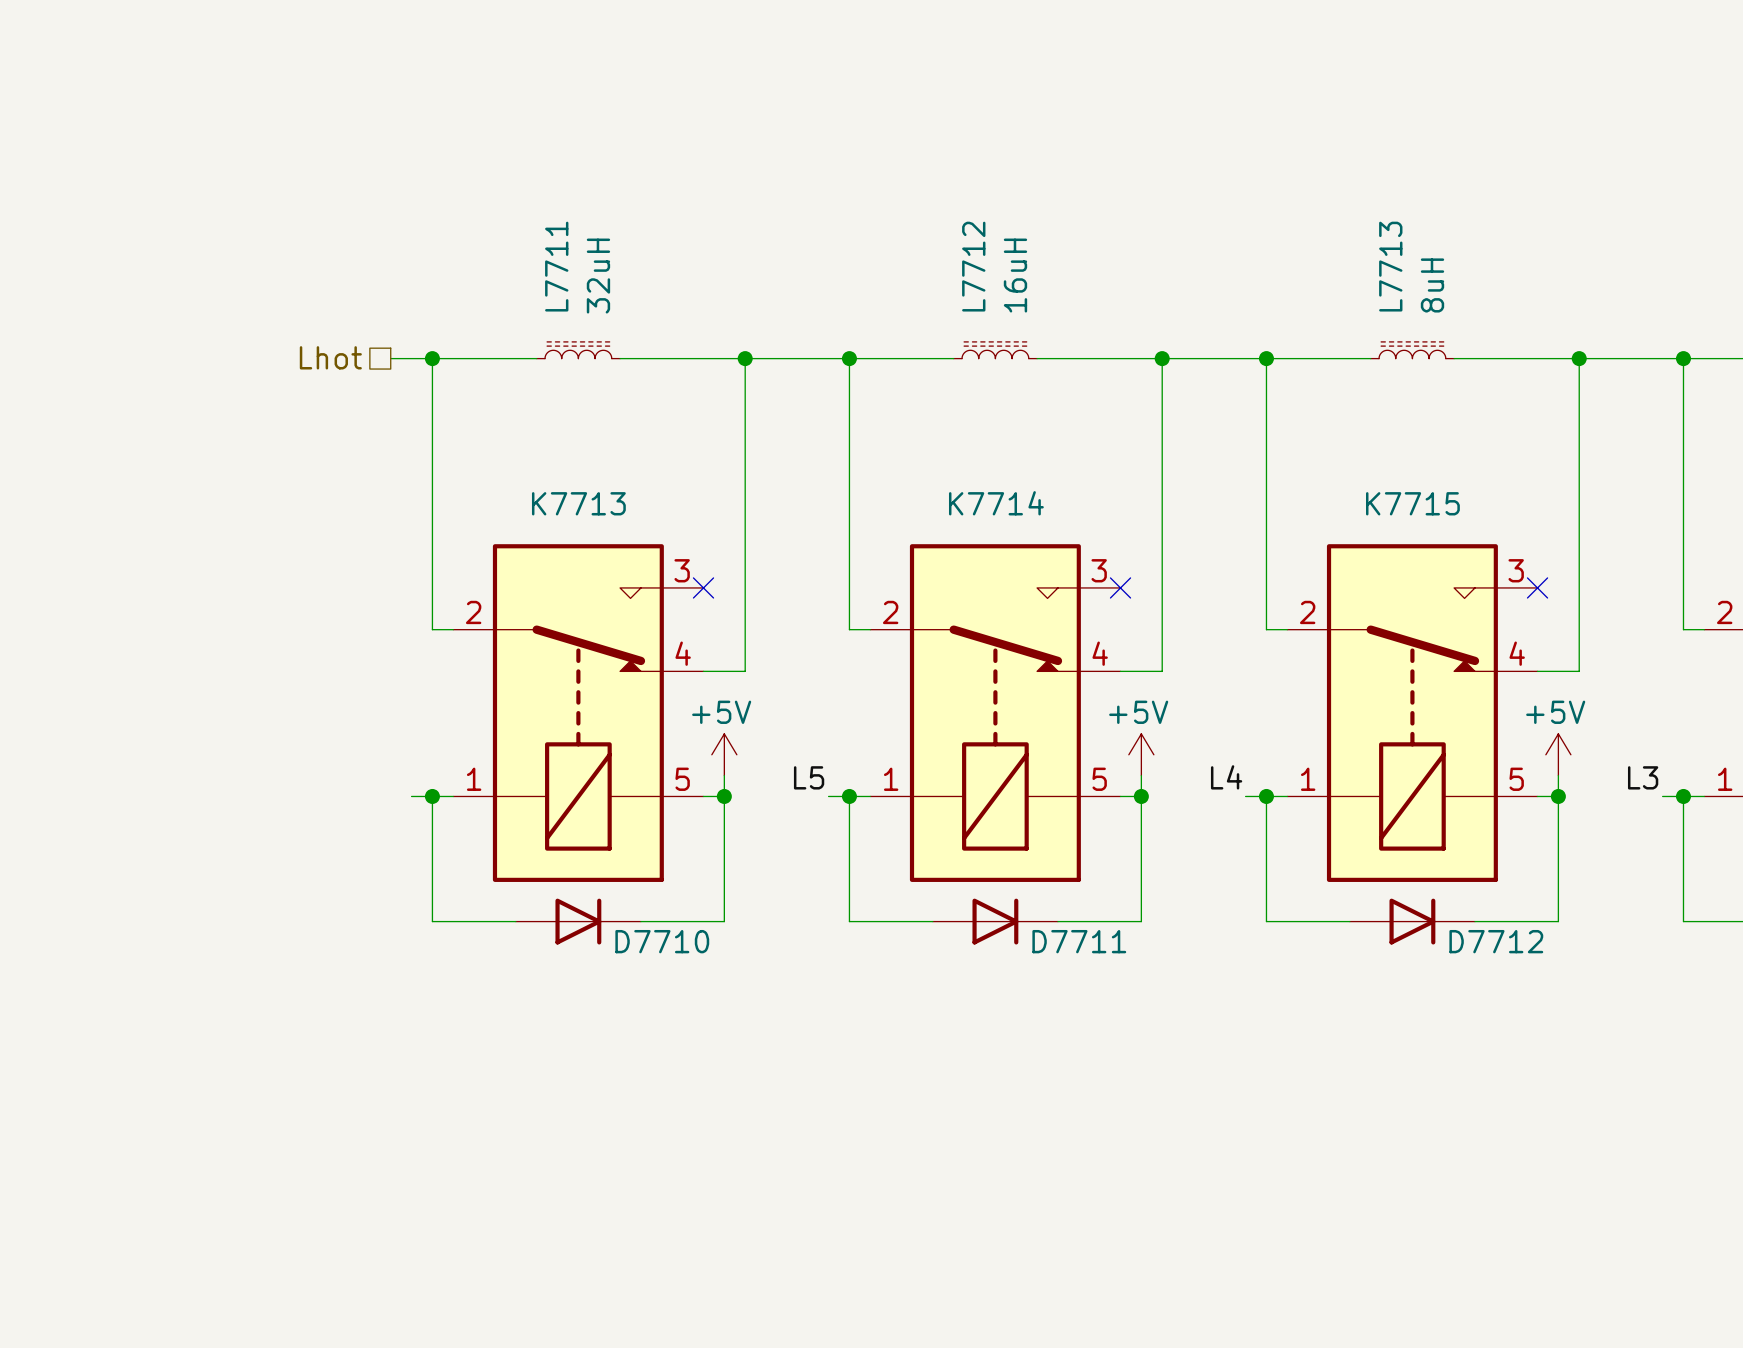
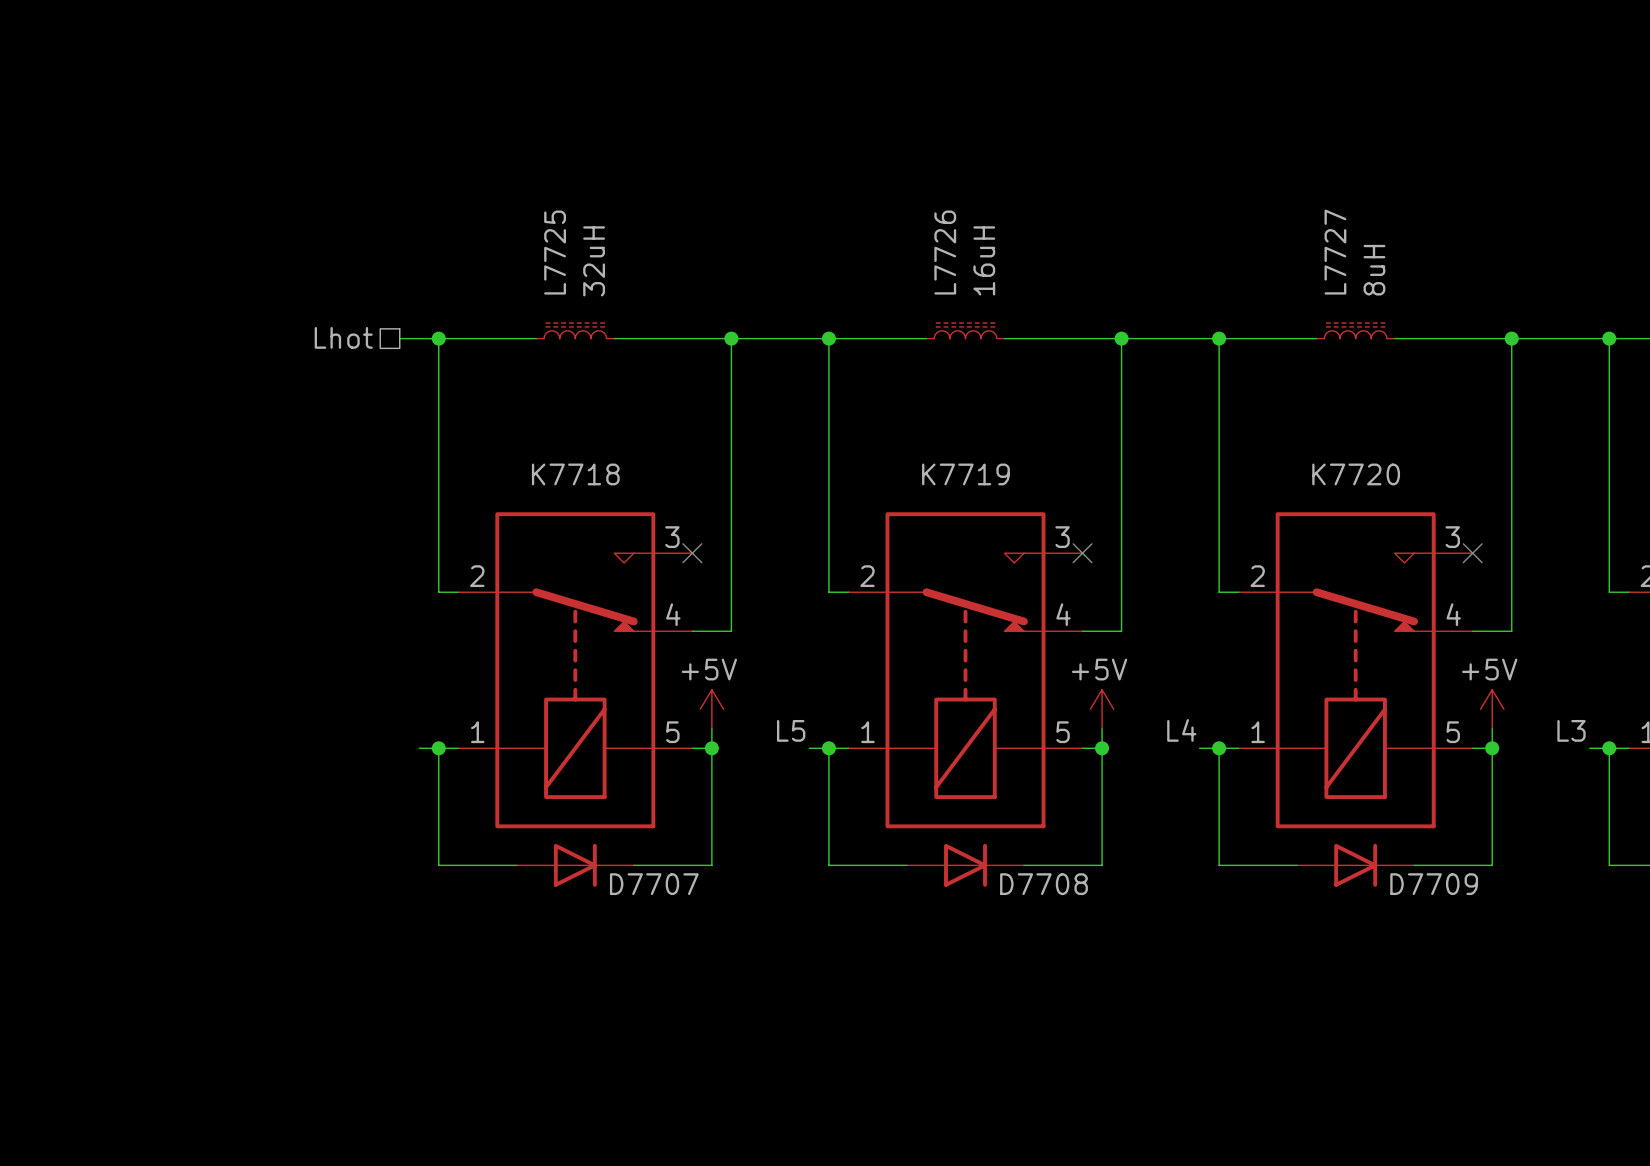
L7711 name: L7711 (556, 266) -> L7725 (555, 252)
L7712 name: L7712 (973, 266) -> L7726 (945, 252)
L7713 name: L7713 (1390, 266) -> L7727 (1335, 252)
K7713 name: K7713 (578, 503) -> K7718 (575, 474)
K7714 name: K7714 (996, 503) -> K7719 (965, 474)
K7715 name: K7715 (1412, 503) -> K7720 (1356, 474)
D7710 name: D7710 (662, 941) -> D7707 (654, 884)
D7711 name: D7711 (1079, 941) -> D7708 (1044, 884)
D7712 name: D7712 (1496, 941) -> D7709 (1434, 884)

